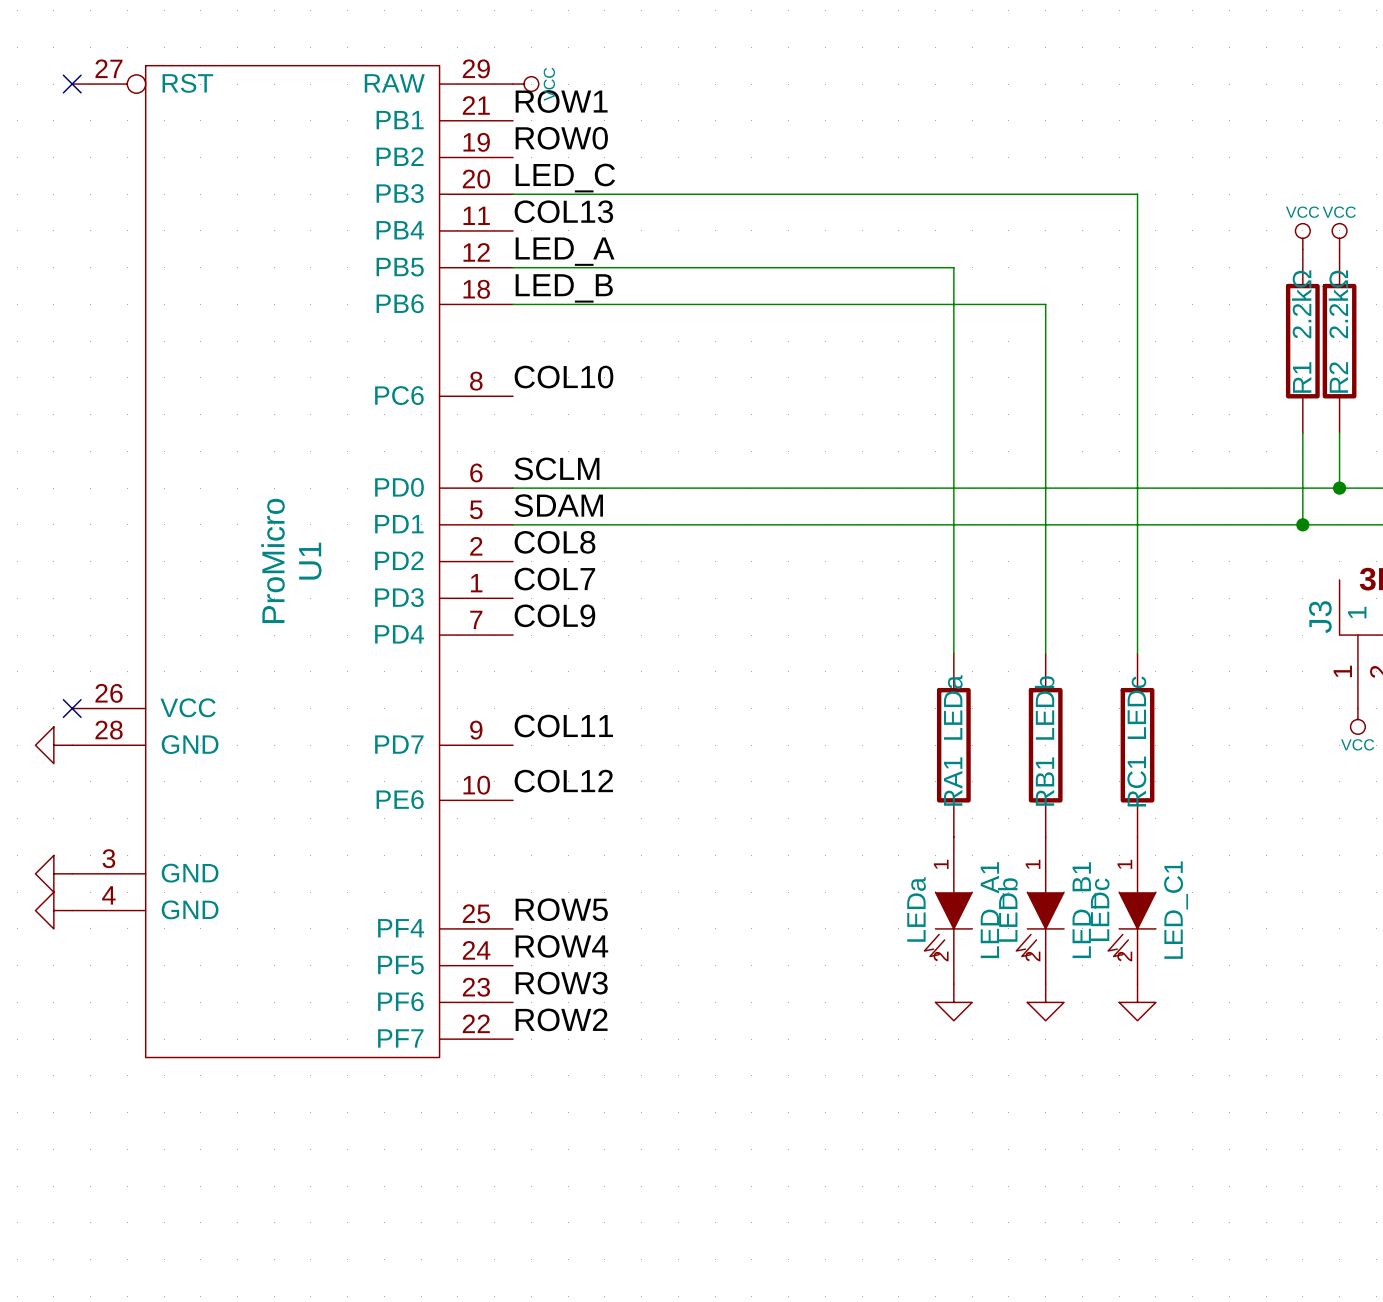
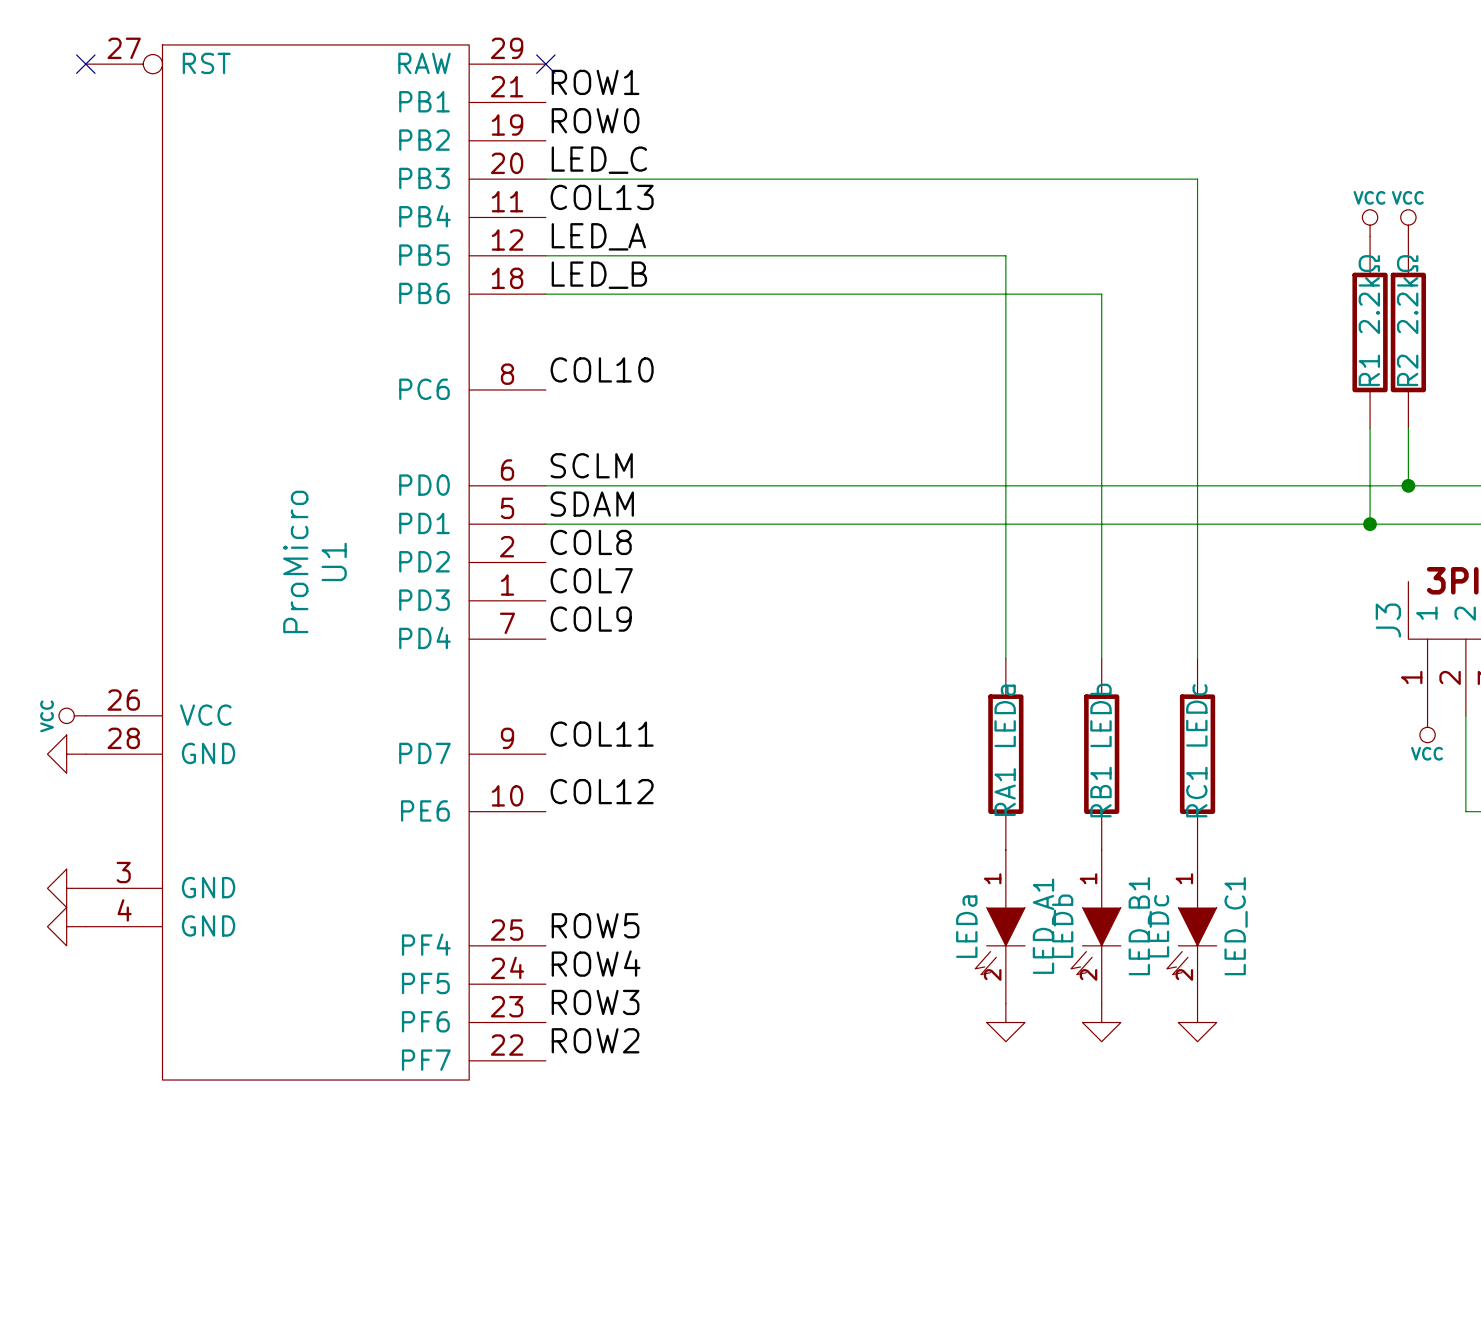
no-connect mark: none -> (545, 64)
power symbol: VCC (525, 84) -> none
power symbol: none -> VCC (72, 715)
no-connect mark: (72, 708) -> none

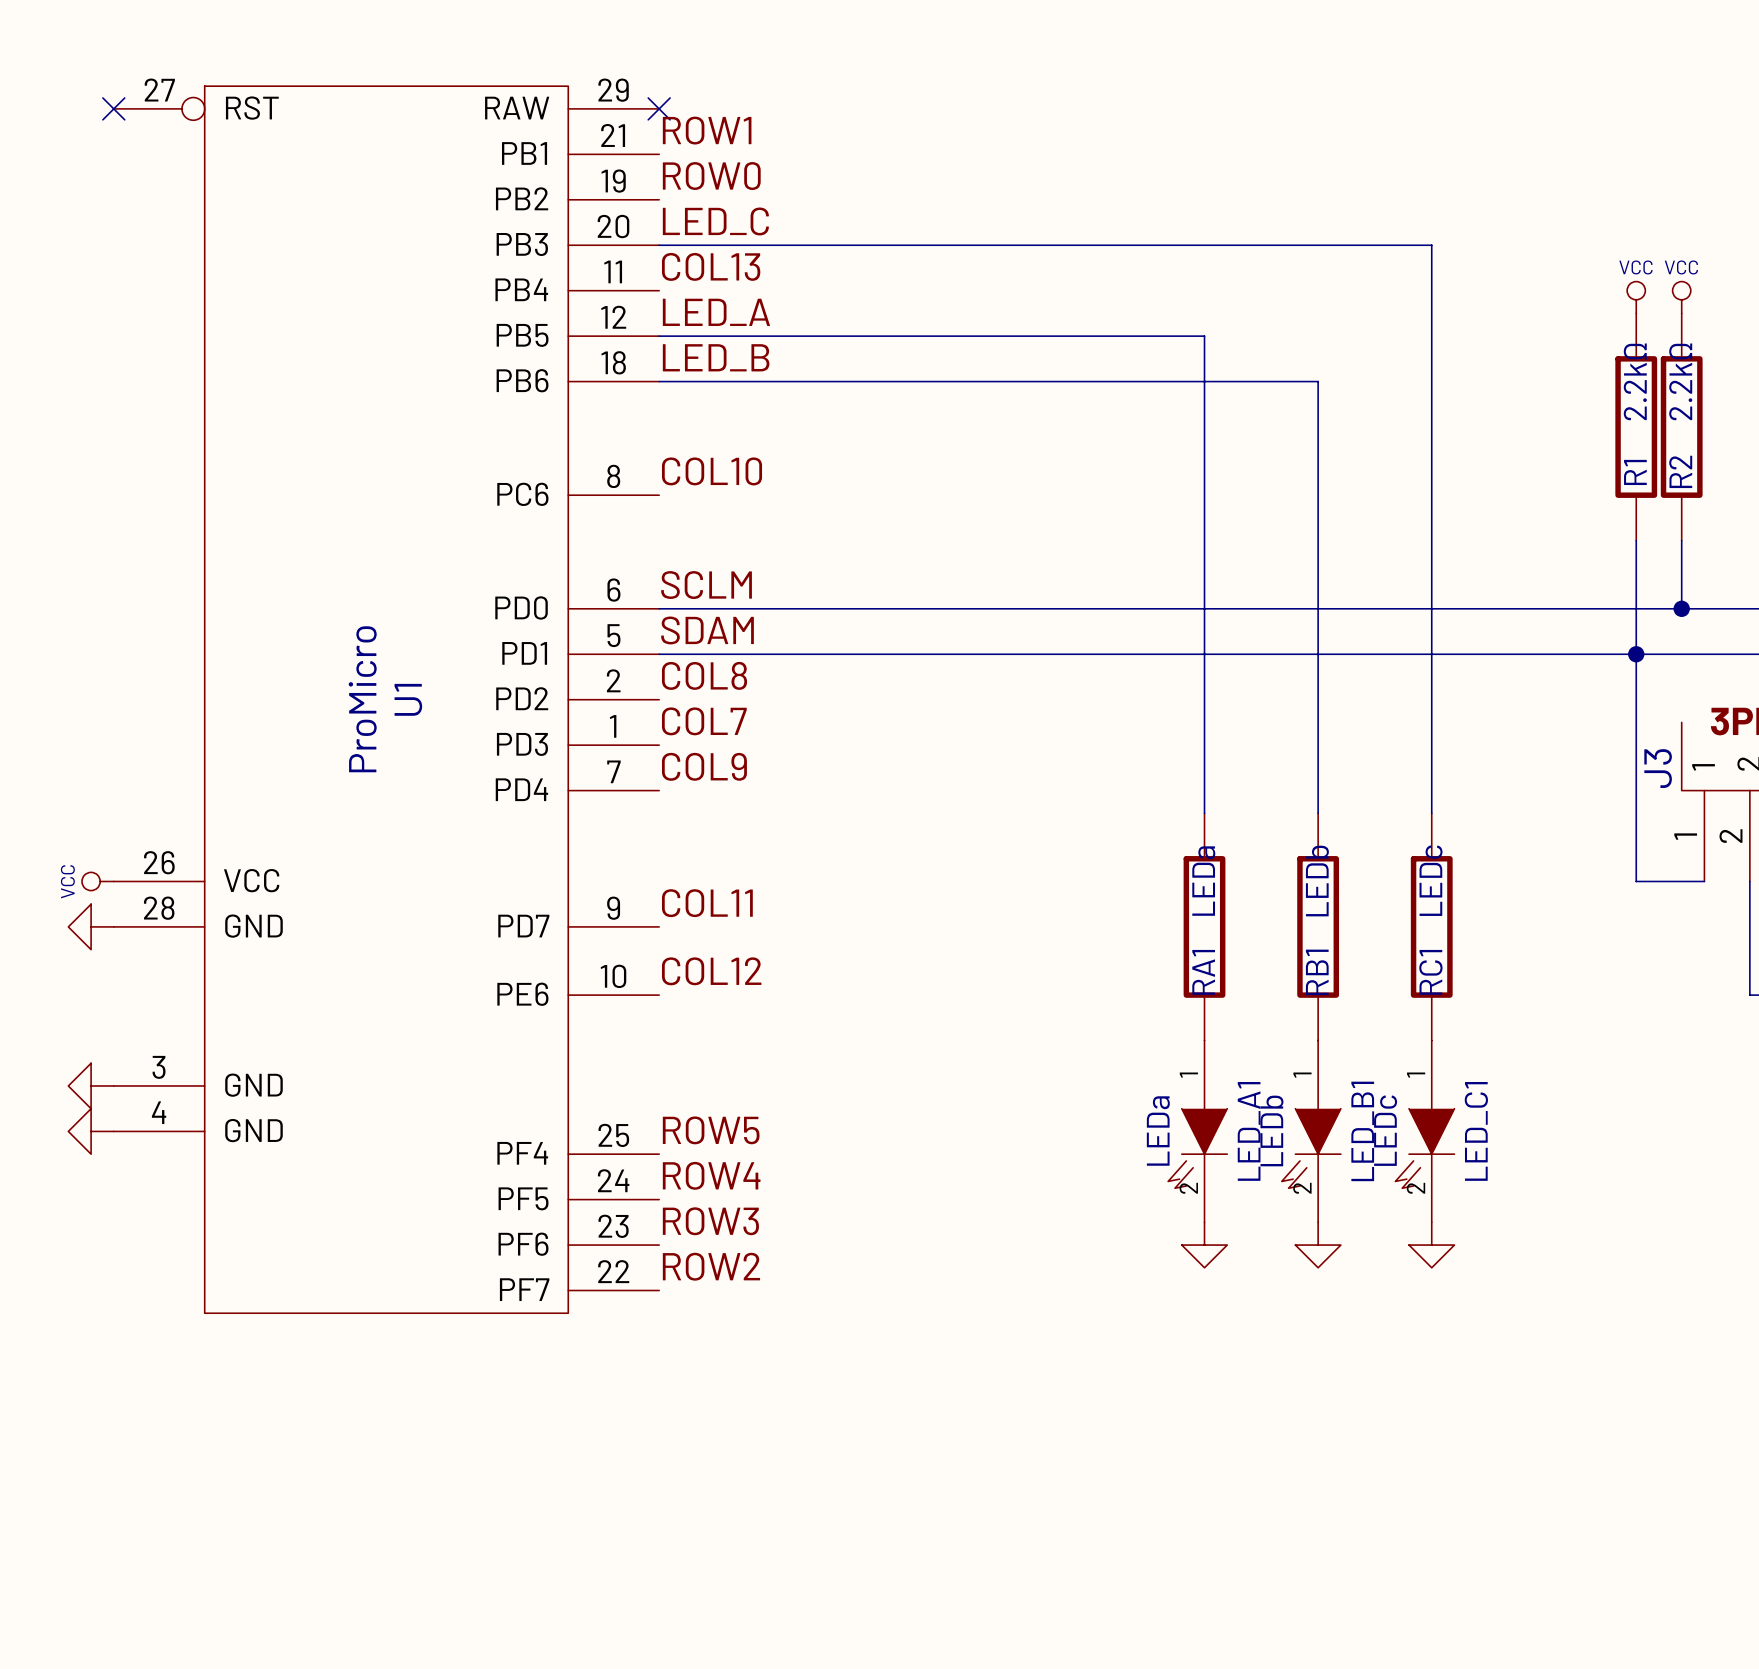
wire: none -> (1636, 654) (1636, 881) (1704, 881)
power symbol: VCC (1427, 729) -> none

